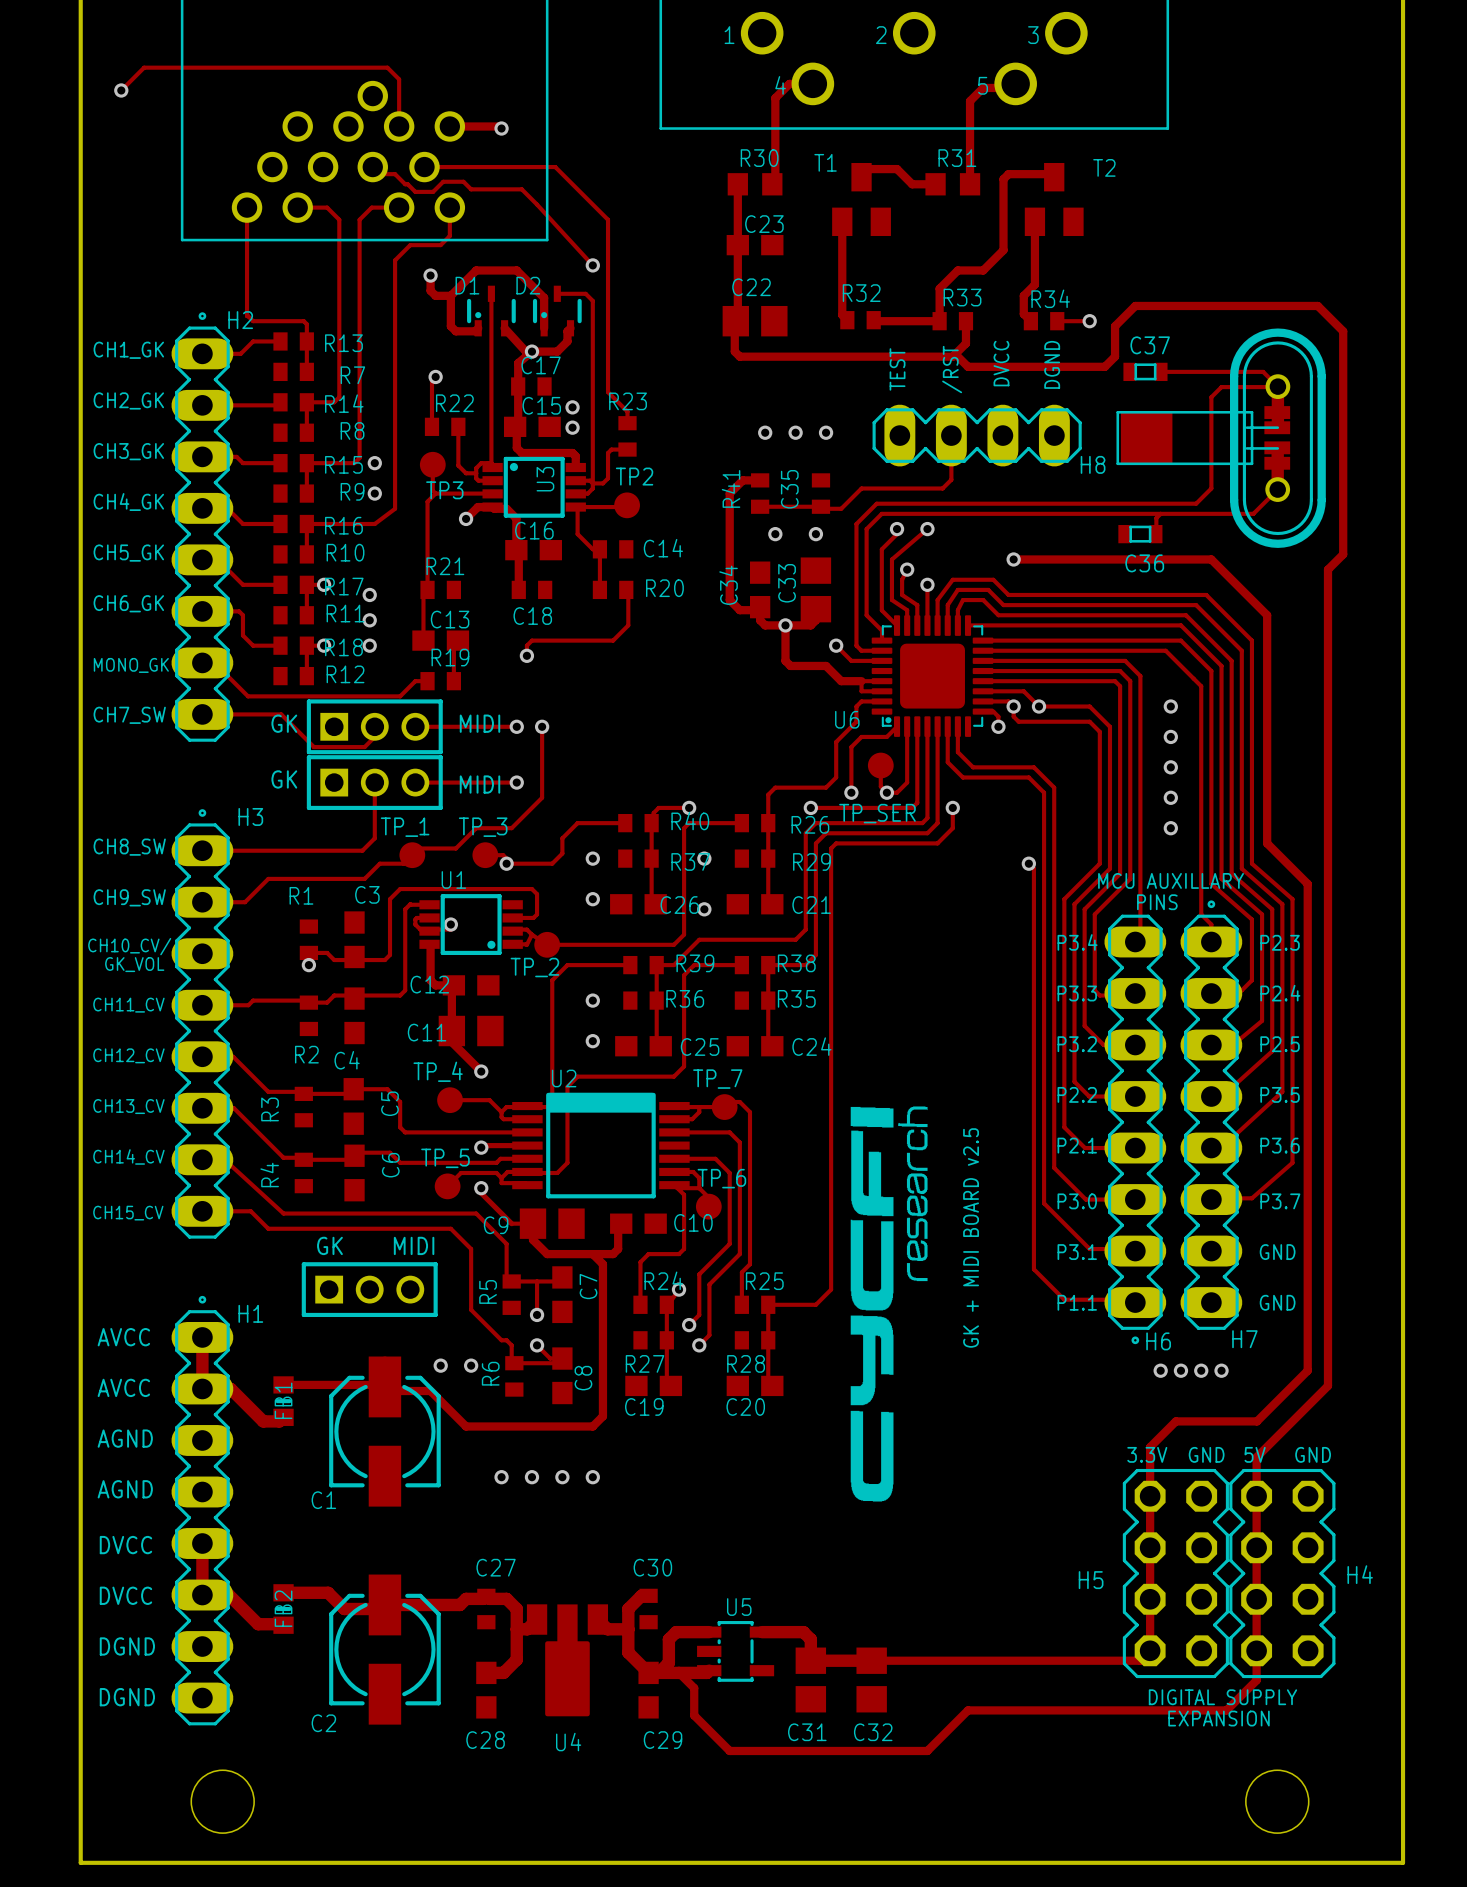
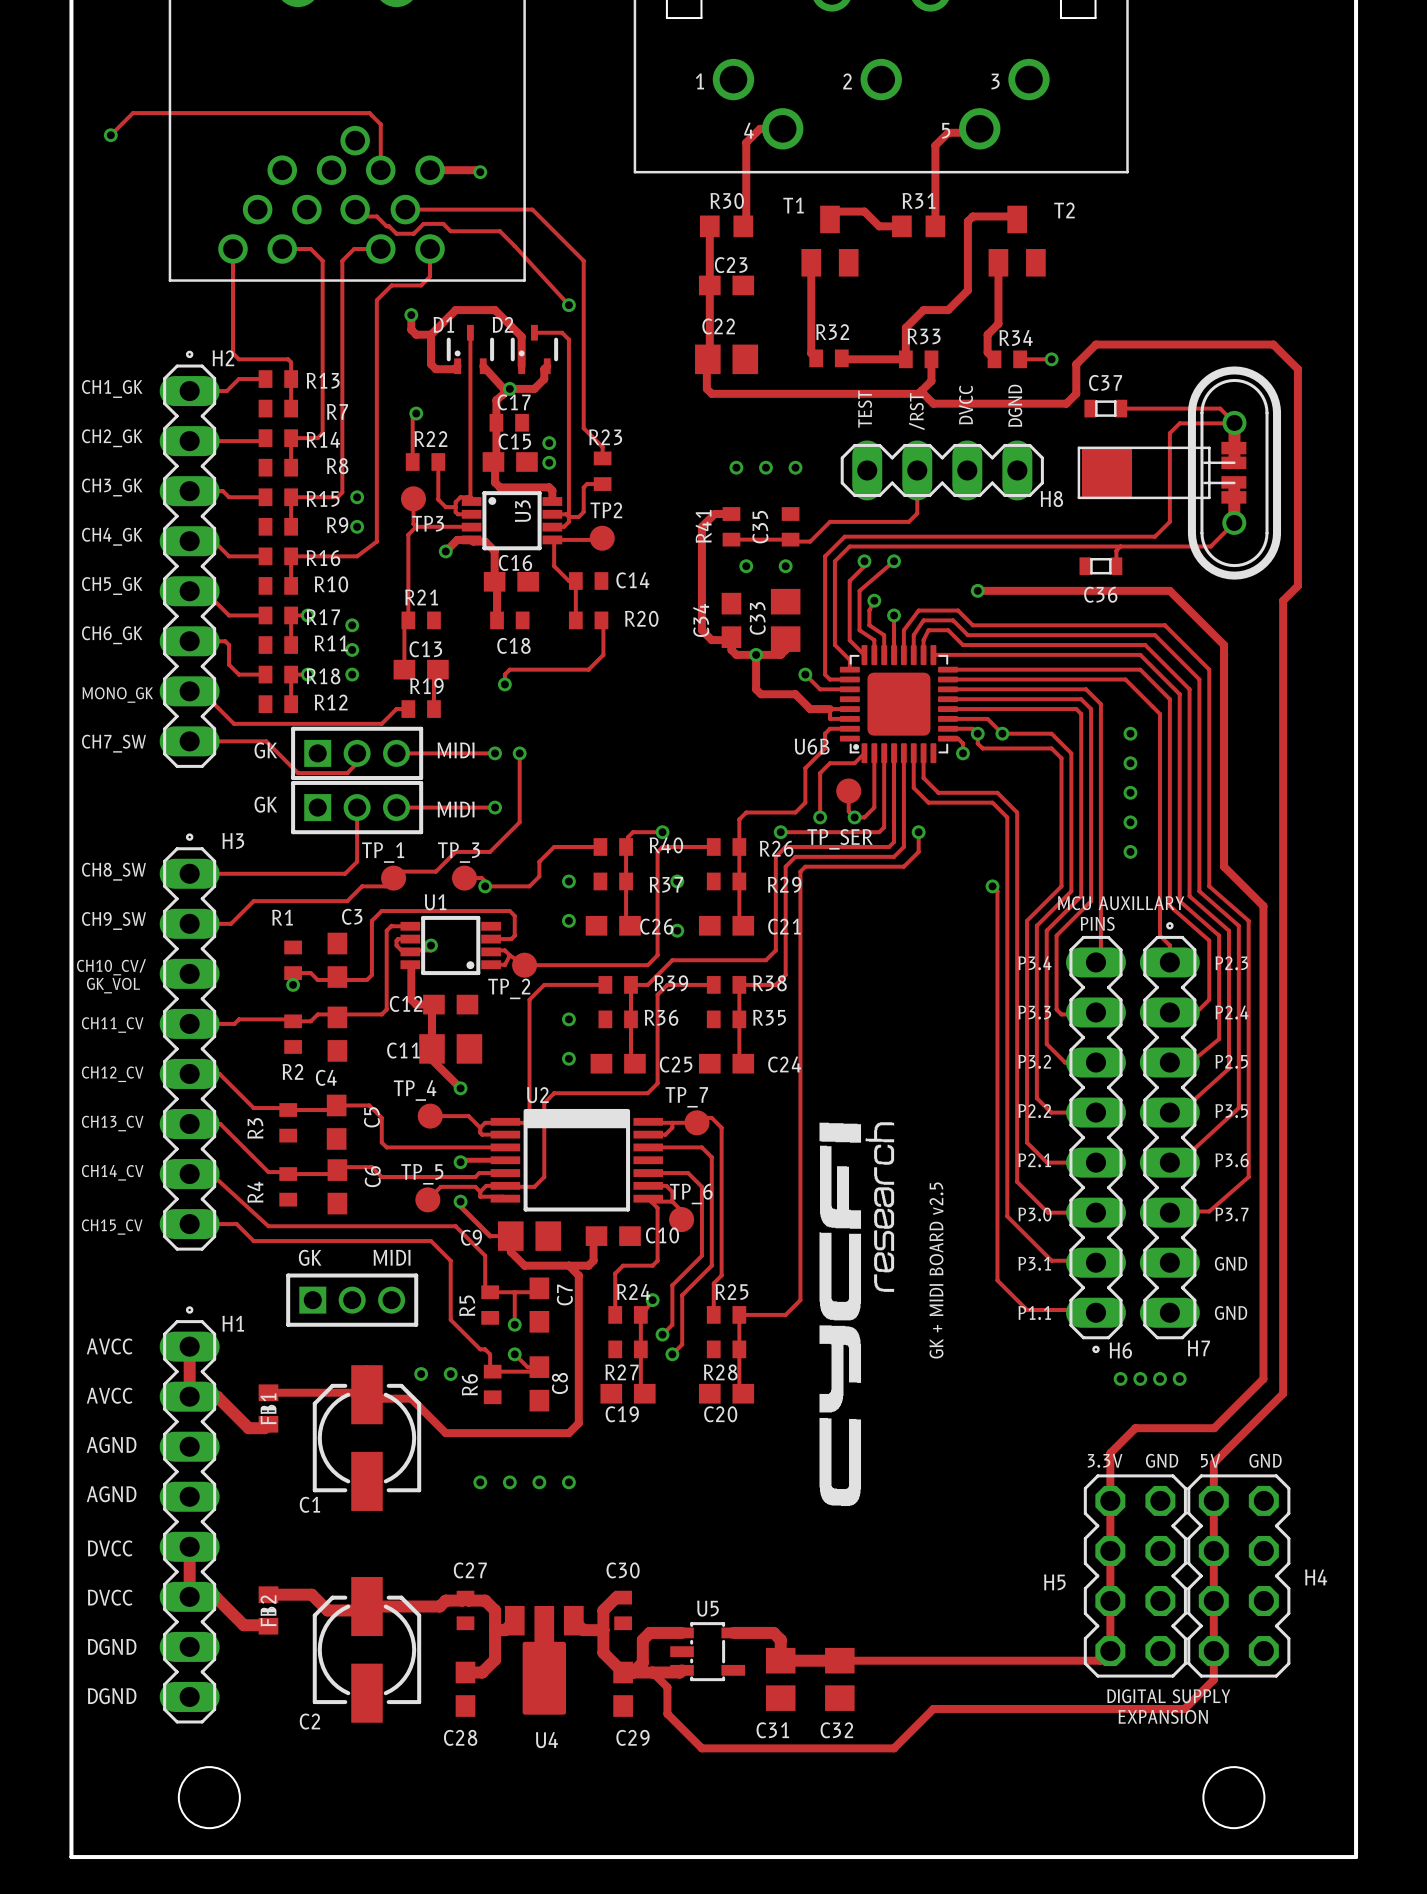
U6 name: U6 (847, 719) -> U6B (812, 746)

